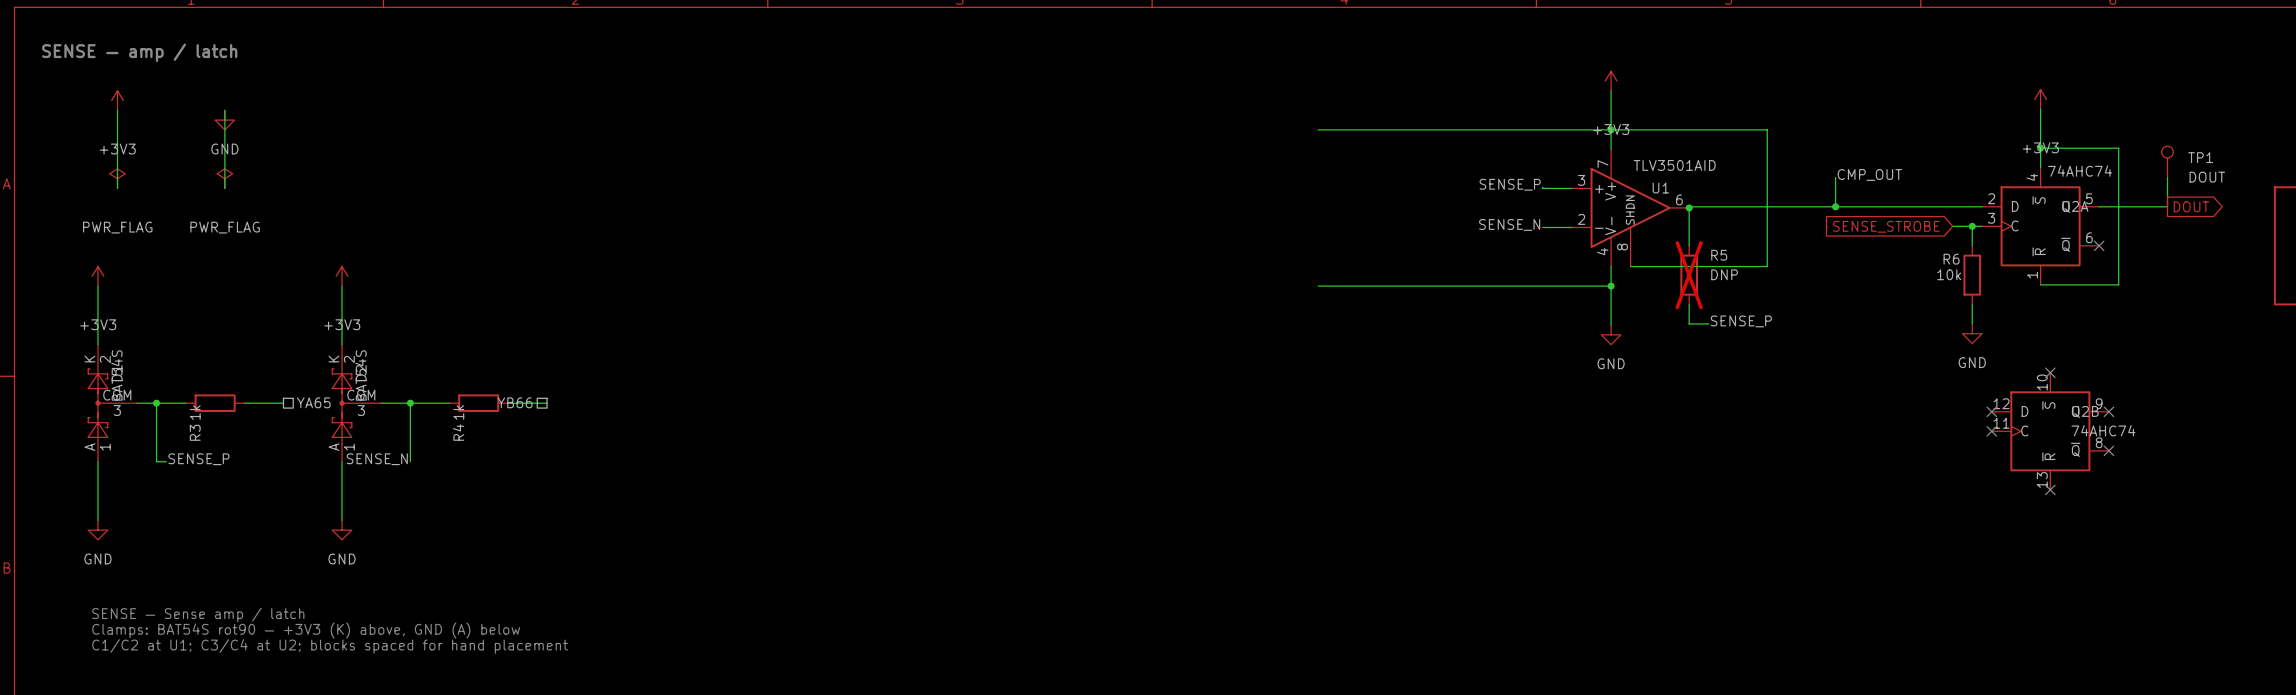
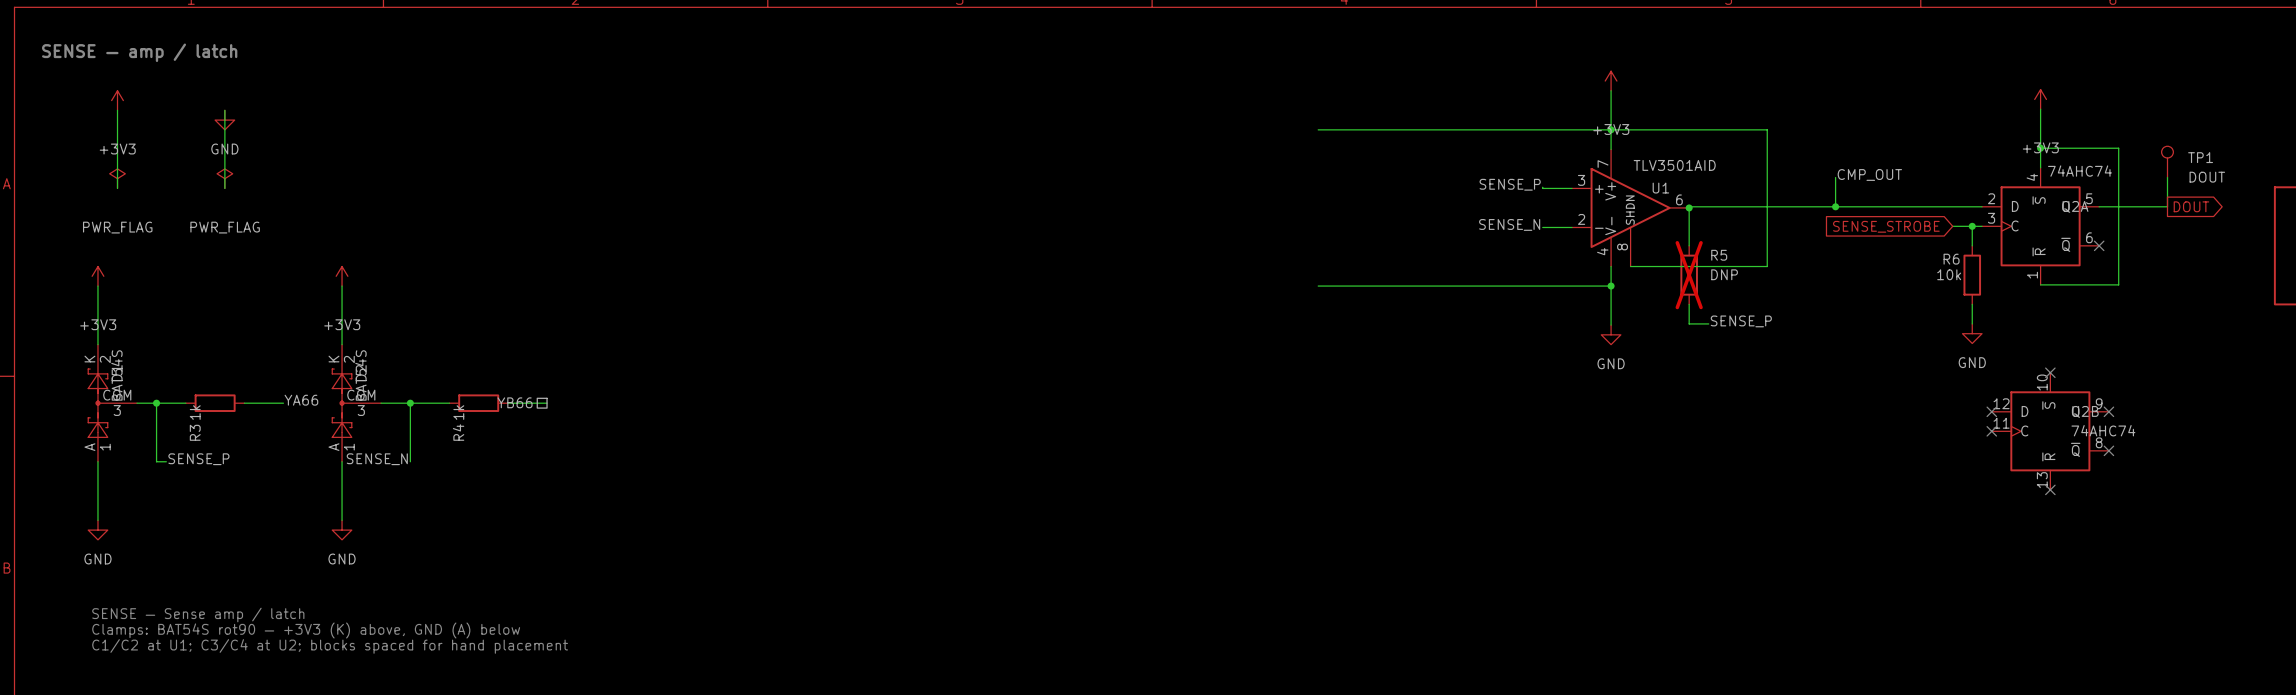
label: none -> YA66 (301, 400)
hierarchical label: YA65 (313, 402) -> none

